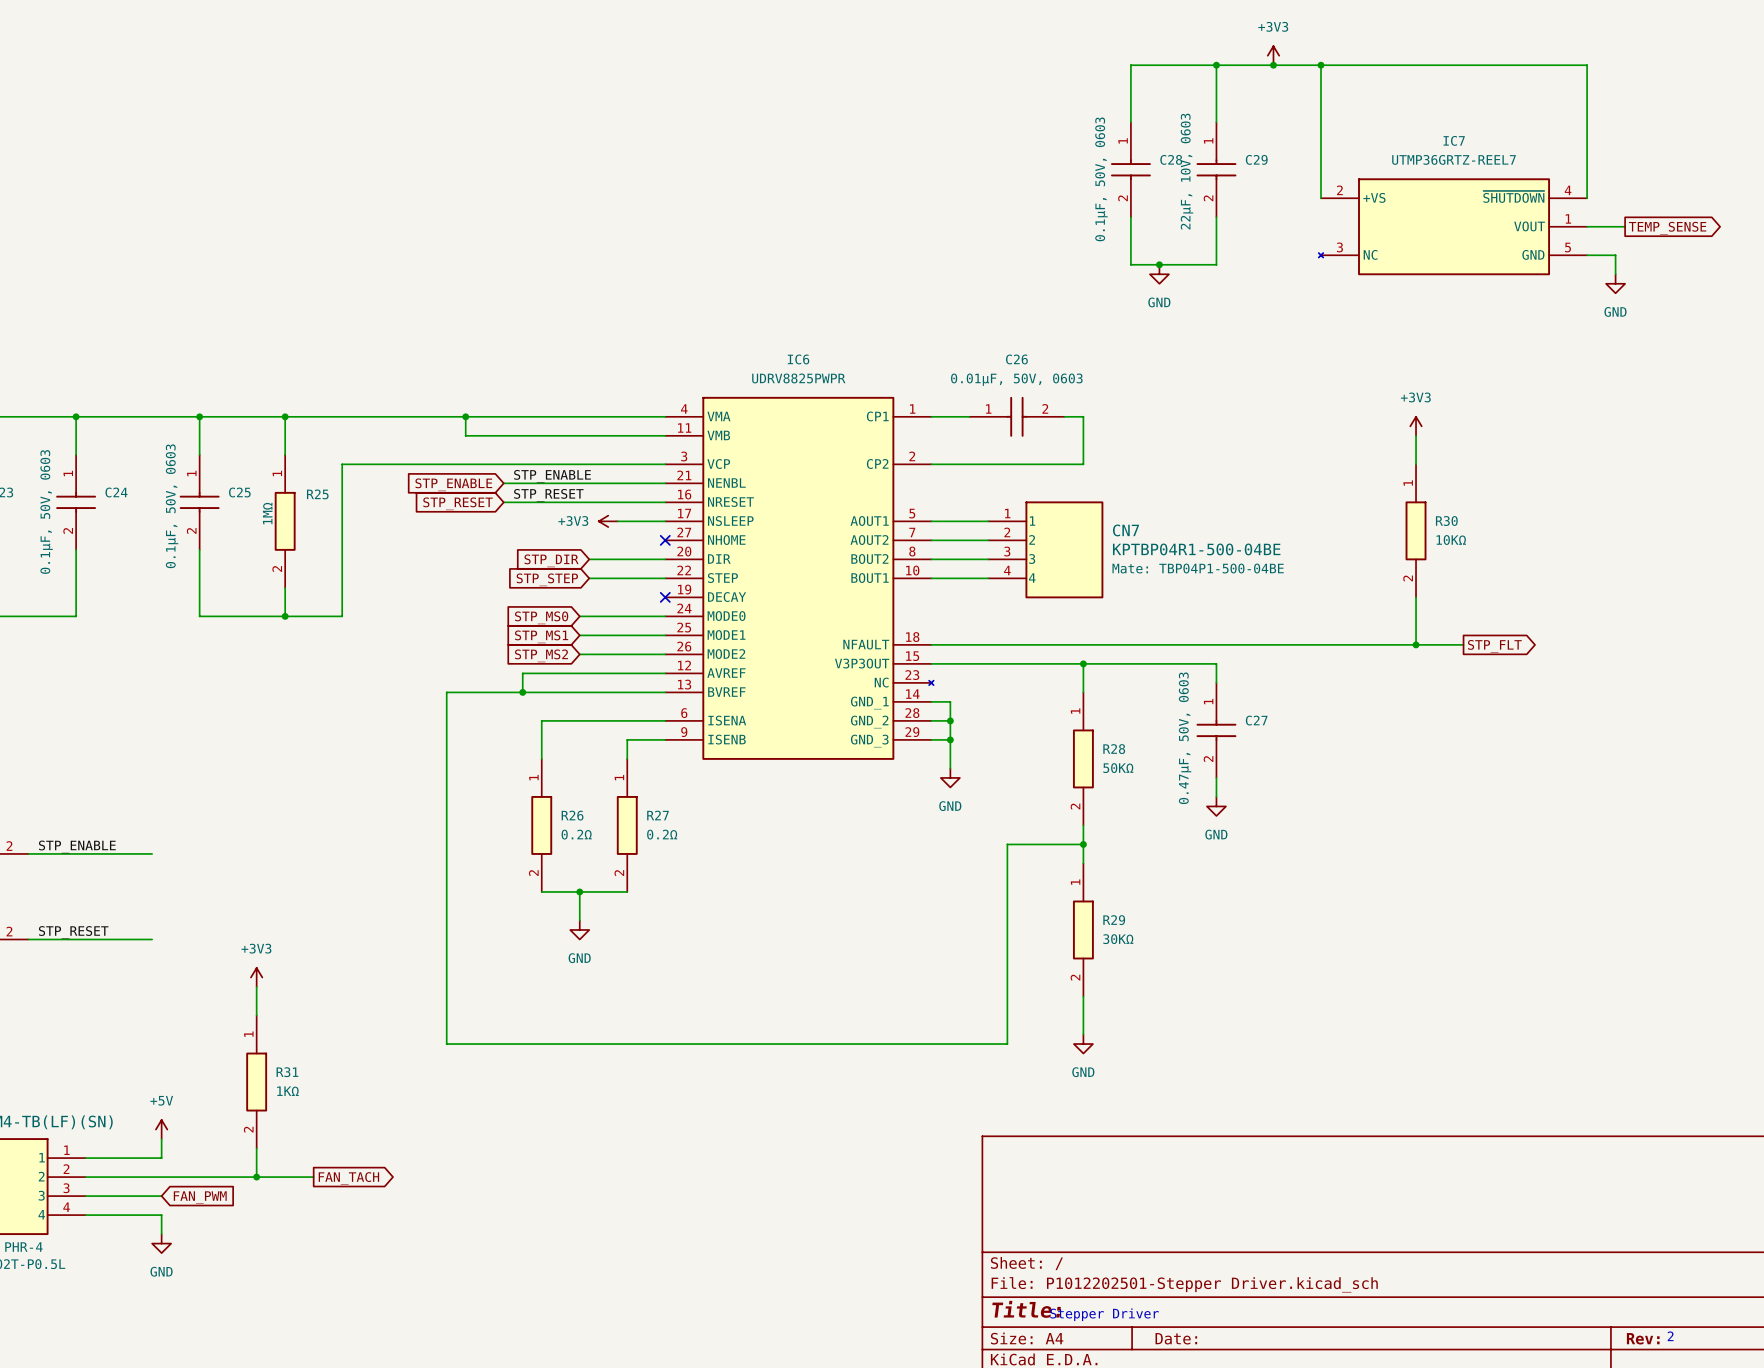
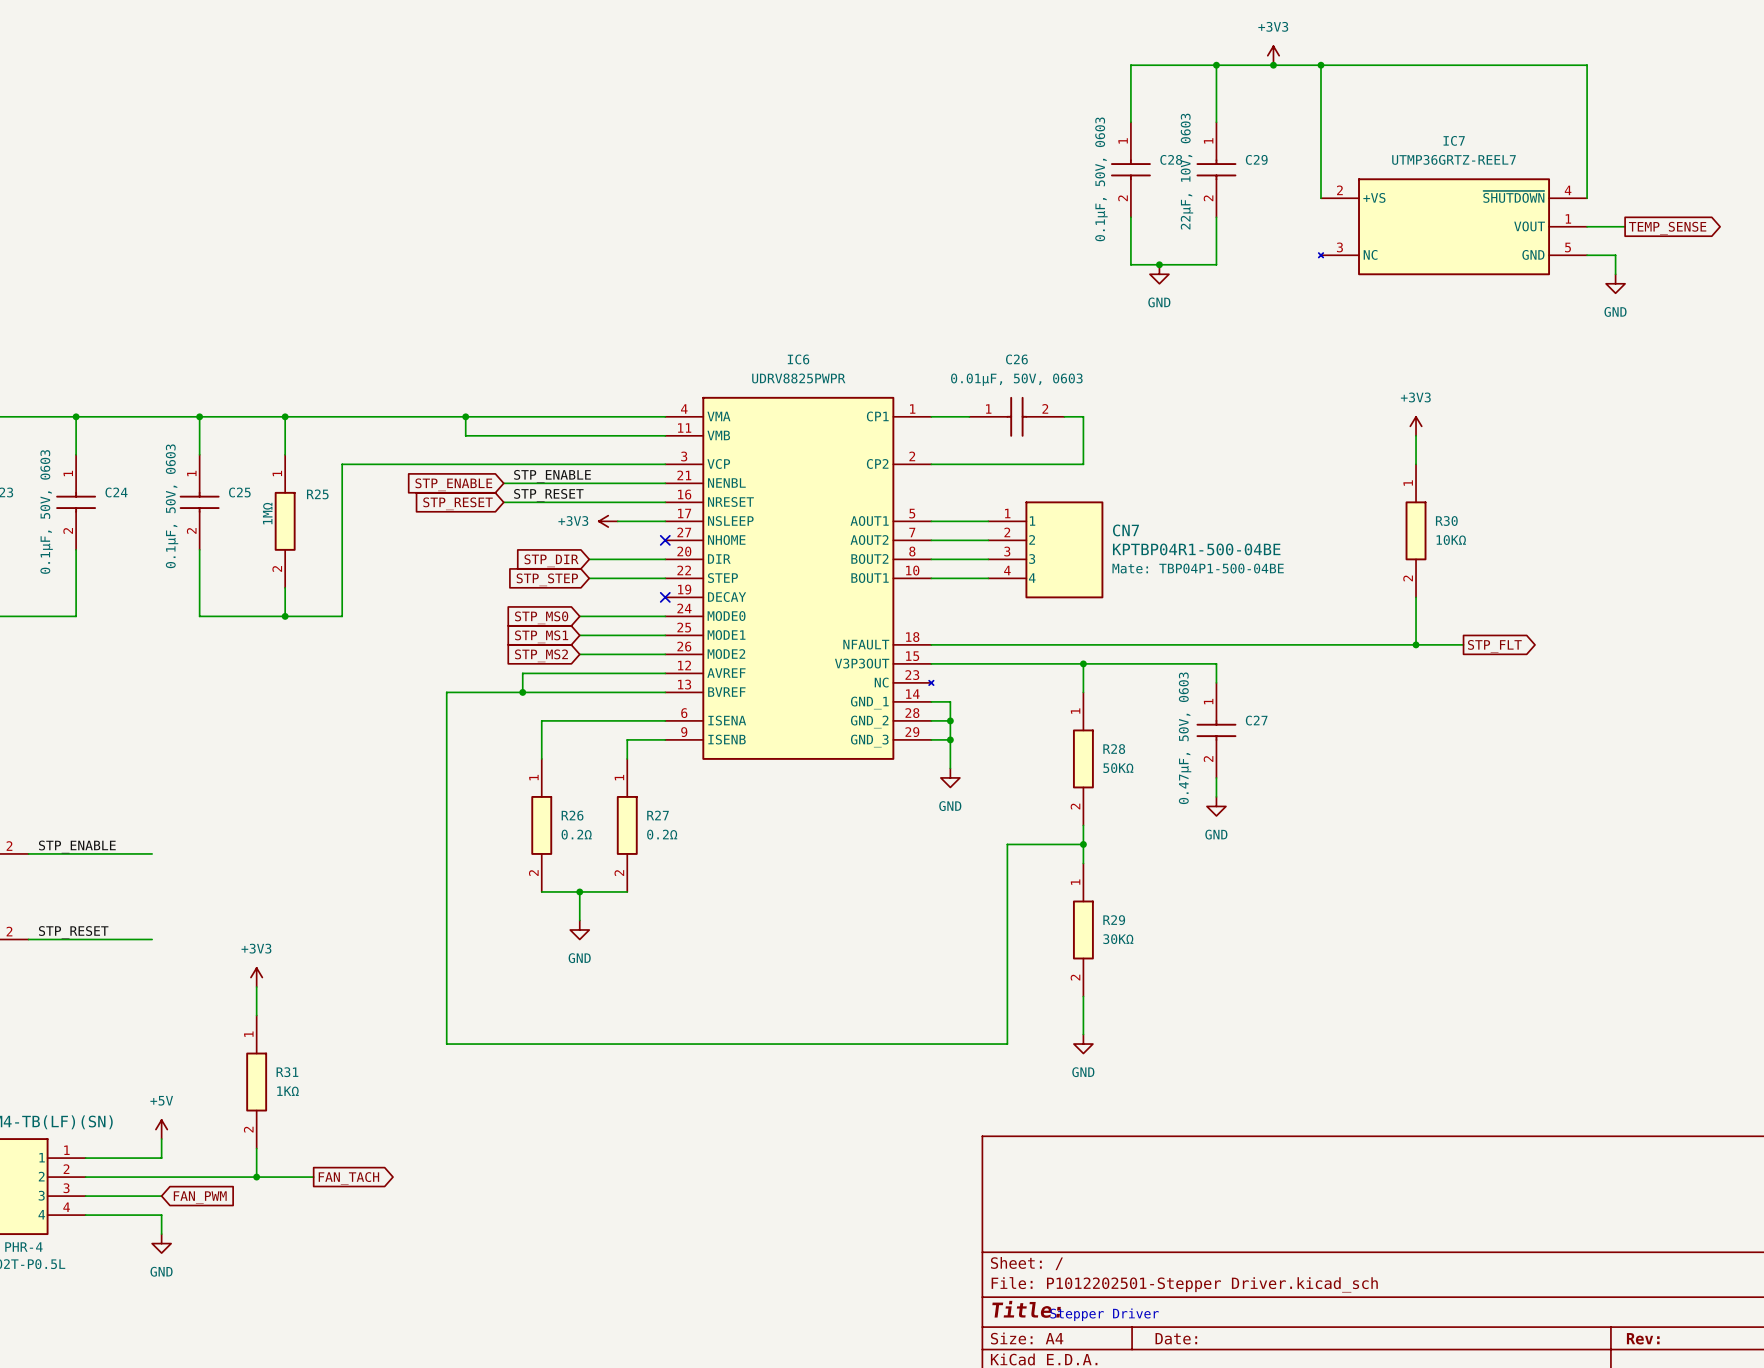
text: 2 (1670, 1336) -> none

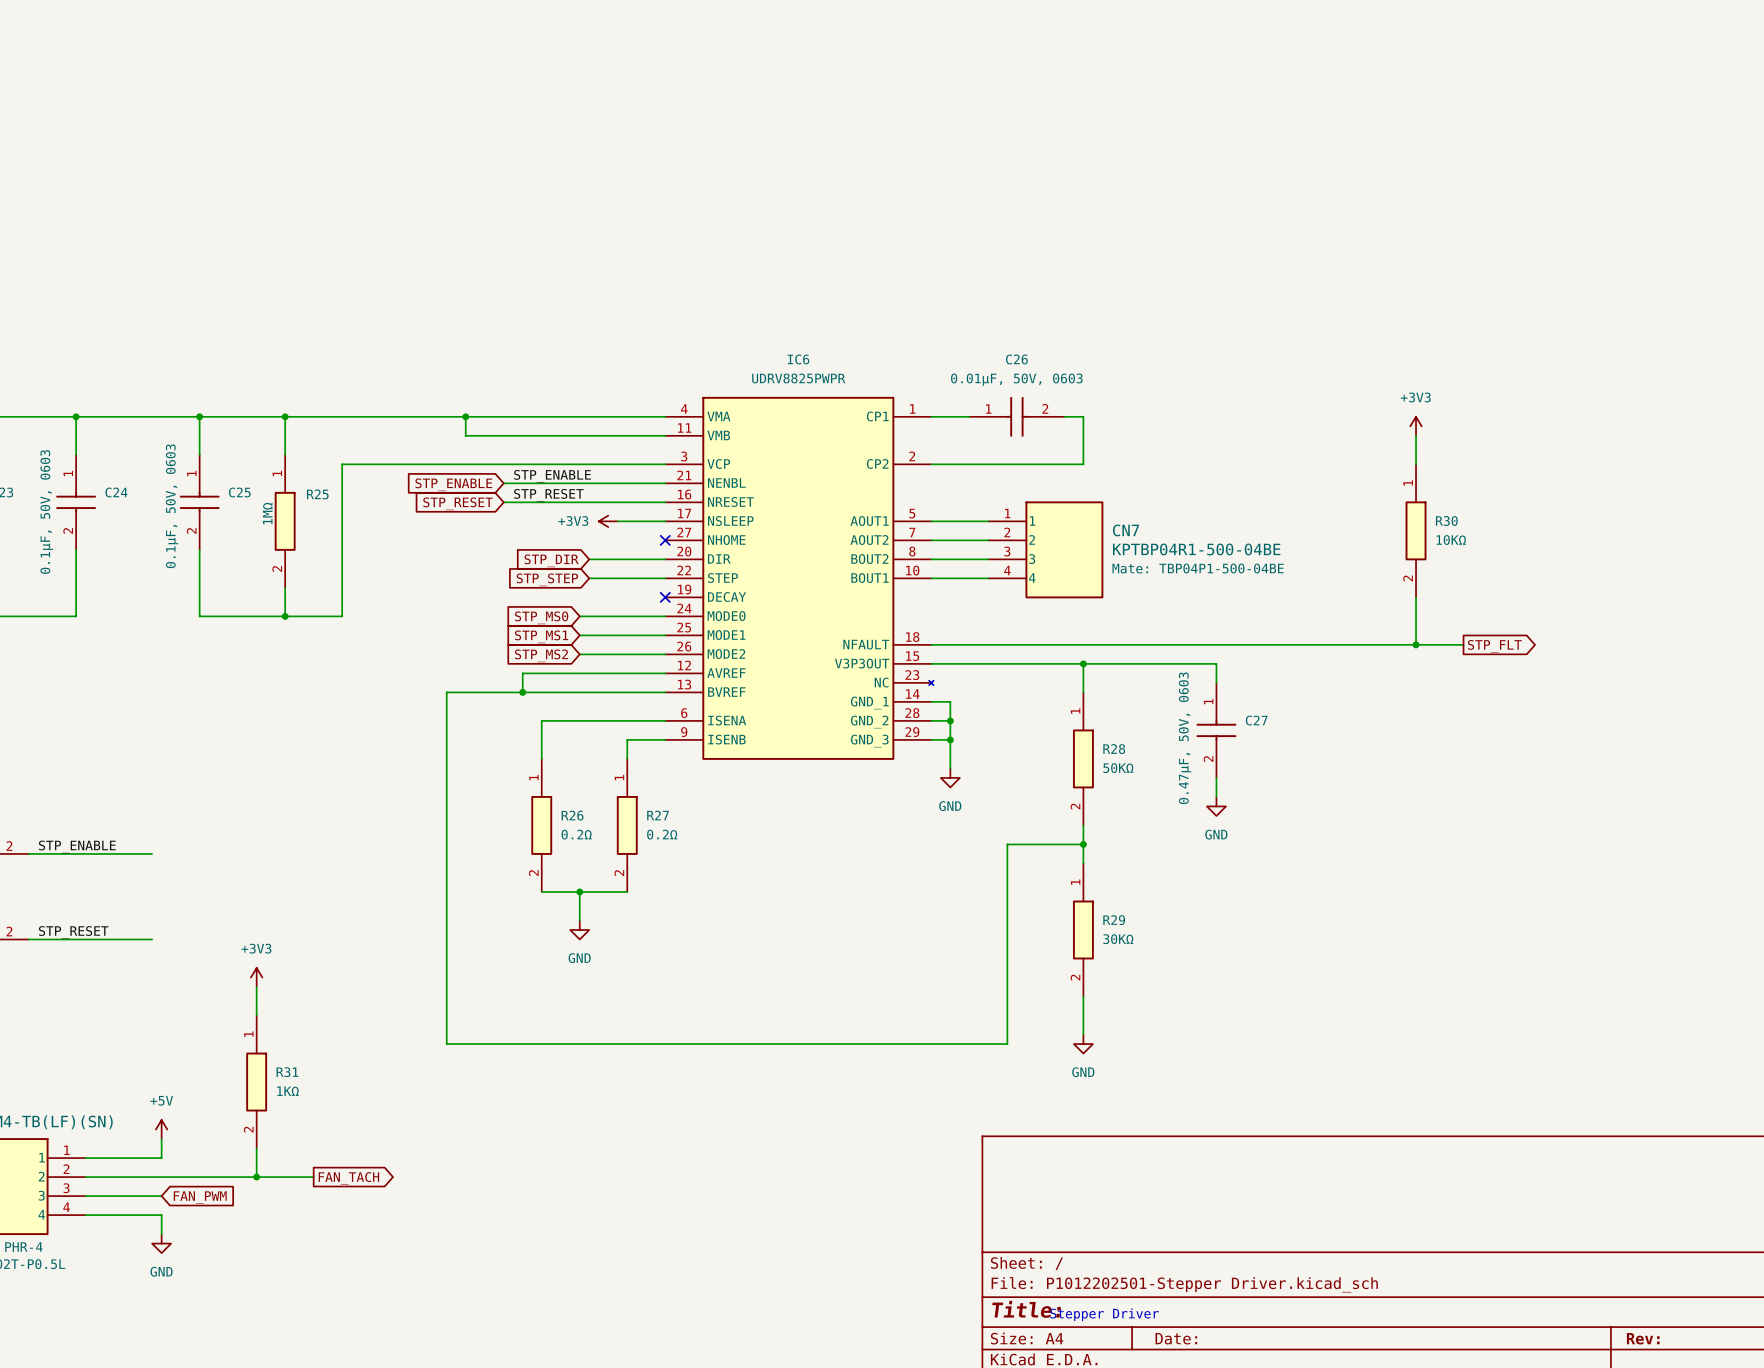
power symbol: +3V3 (1273, 55) -> none
wire: (1216, 65) (1216, 122) -> none
junction: (1216, 65) -> none
junction: (1273, 65) -> none
wire: (1320, 65) (1320, 198) -> none
junction: (1320, 65) -> none
wire: (1130, 122) (1130, 65) (1587, 65) (1587, 198) -> none
C28: (1130, 169) -> none
C29: (1216, 169) -> none
wire: (1130, 217) (1130, 264) (1216, 264) (1216, 217) -> none
IC7: UTMP36GRTZ-REEL7 (1452, 226) -> none
wire: (1587, 226) (1625, 226) -> none
global label: TEMP_SENSE (1667, 228) -> none
wire: (1587, 255) (1615, 255) (1615, 274) -> none
junction: (1159, 264) -> none
power symbol: GND (1159, 274) -> none
power symbol: GND (1615, 283) -> none

